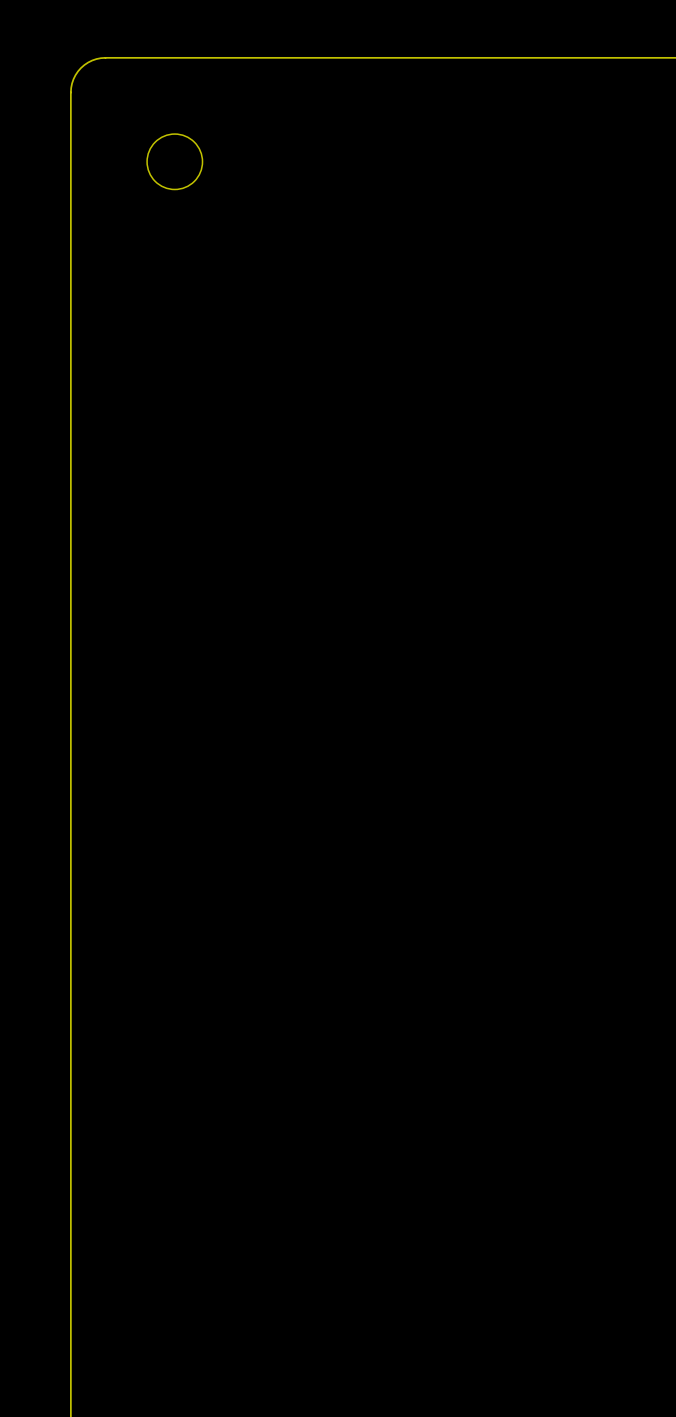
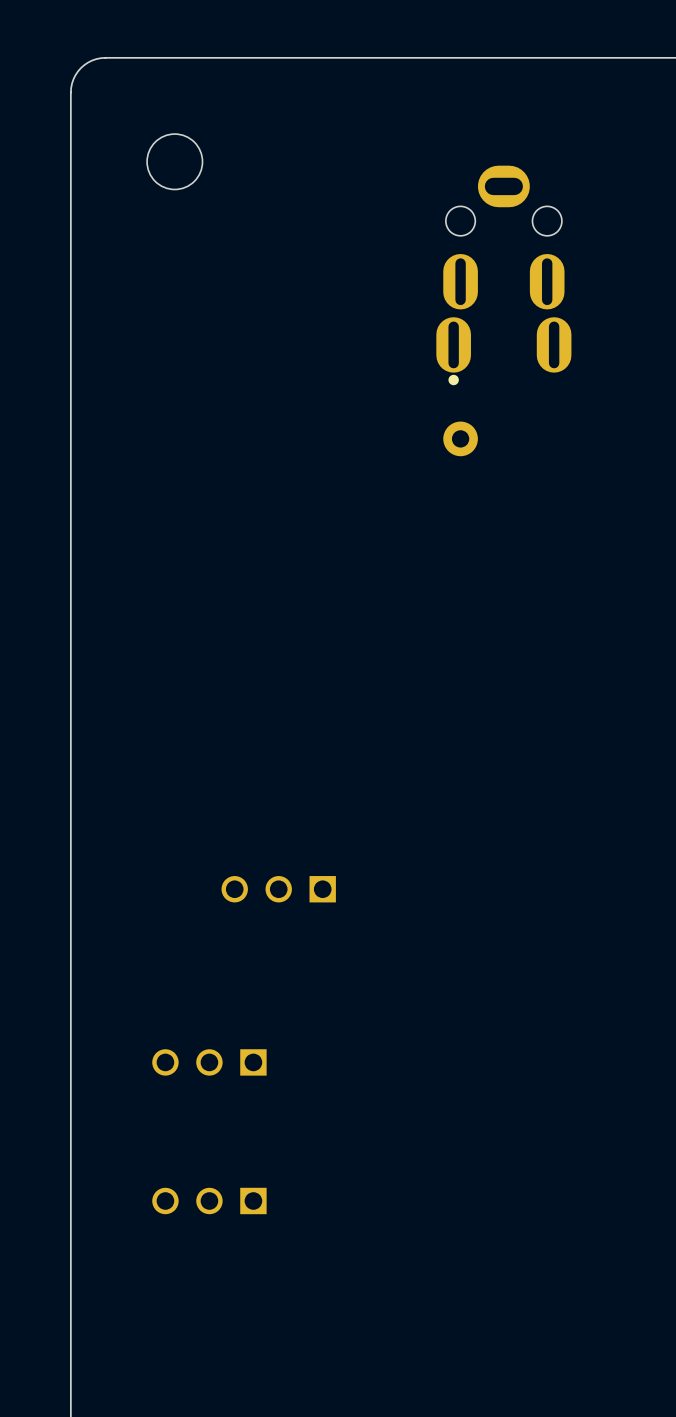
part: none -> (503, 275)
part: none -> (460, 438)
part: none -> (278, 889)
part: none -> (209, 1062)
part: none -> (209, 1201)

